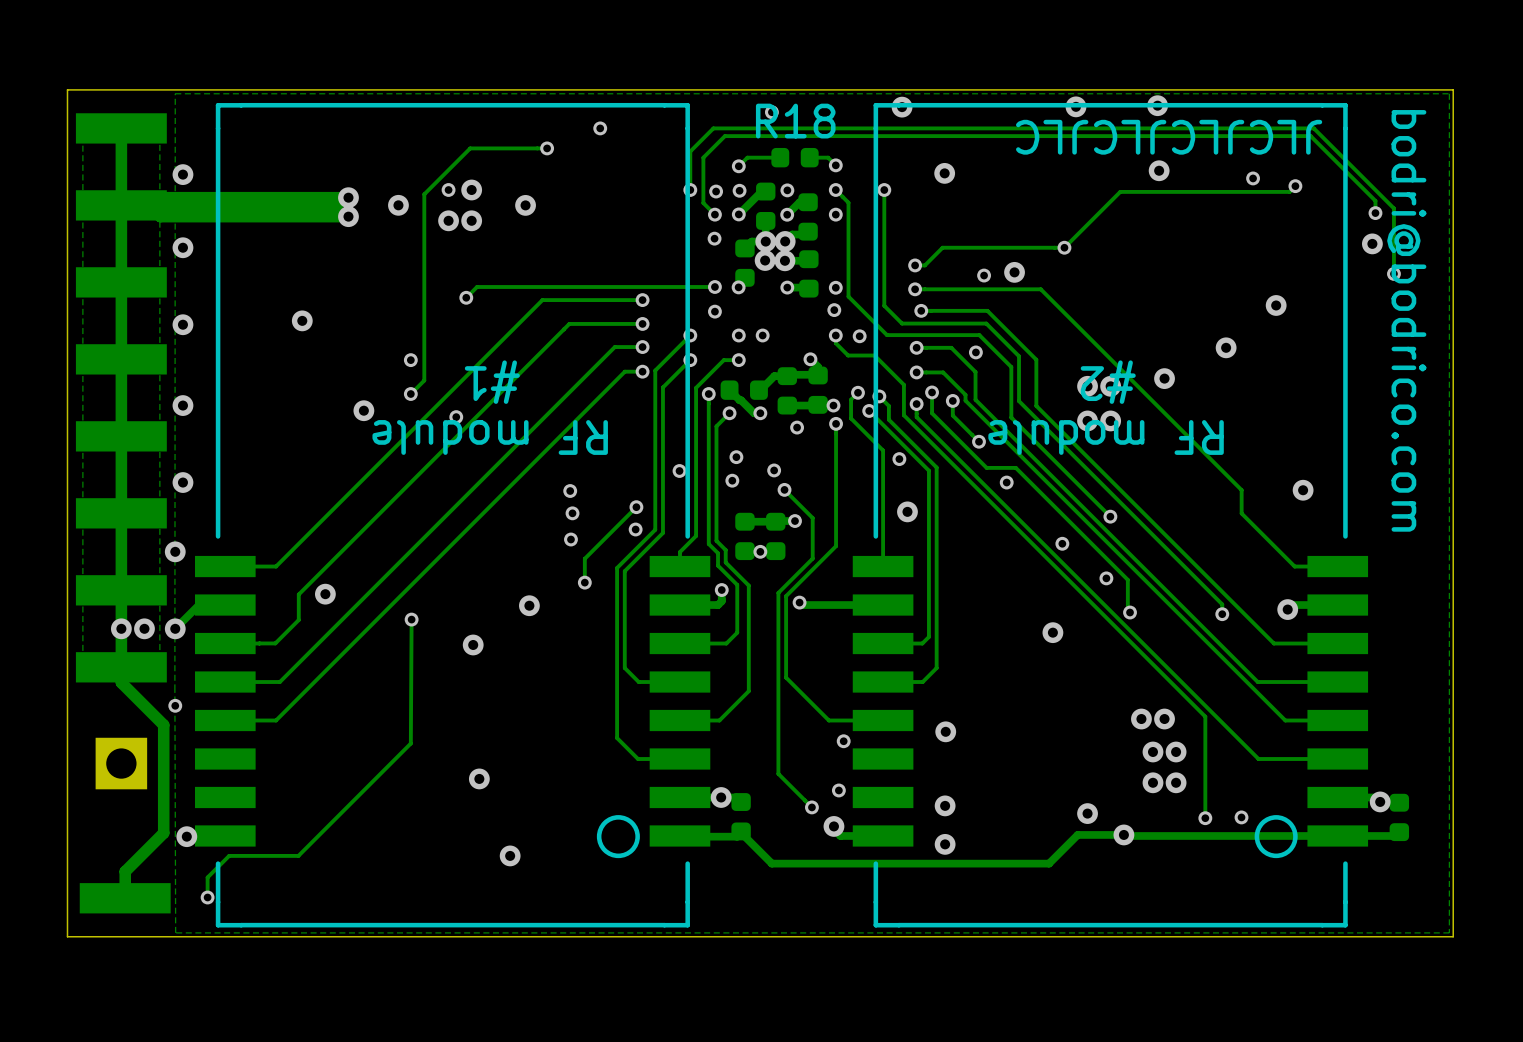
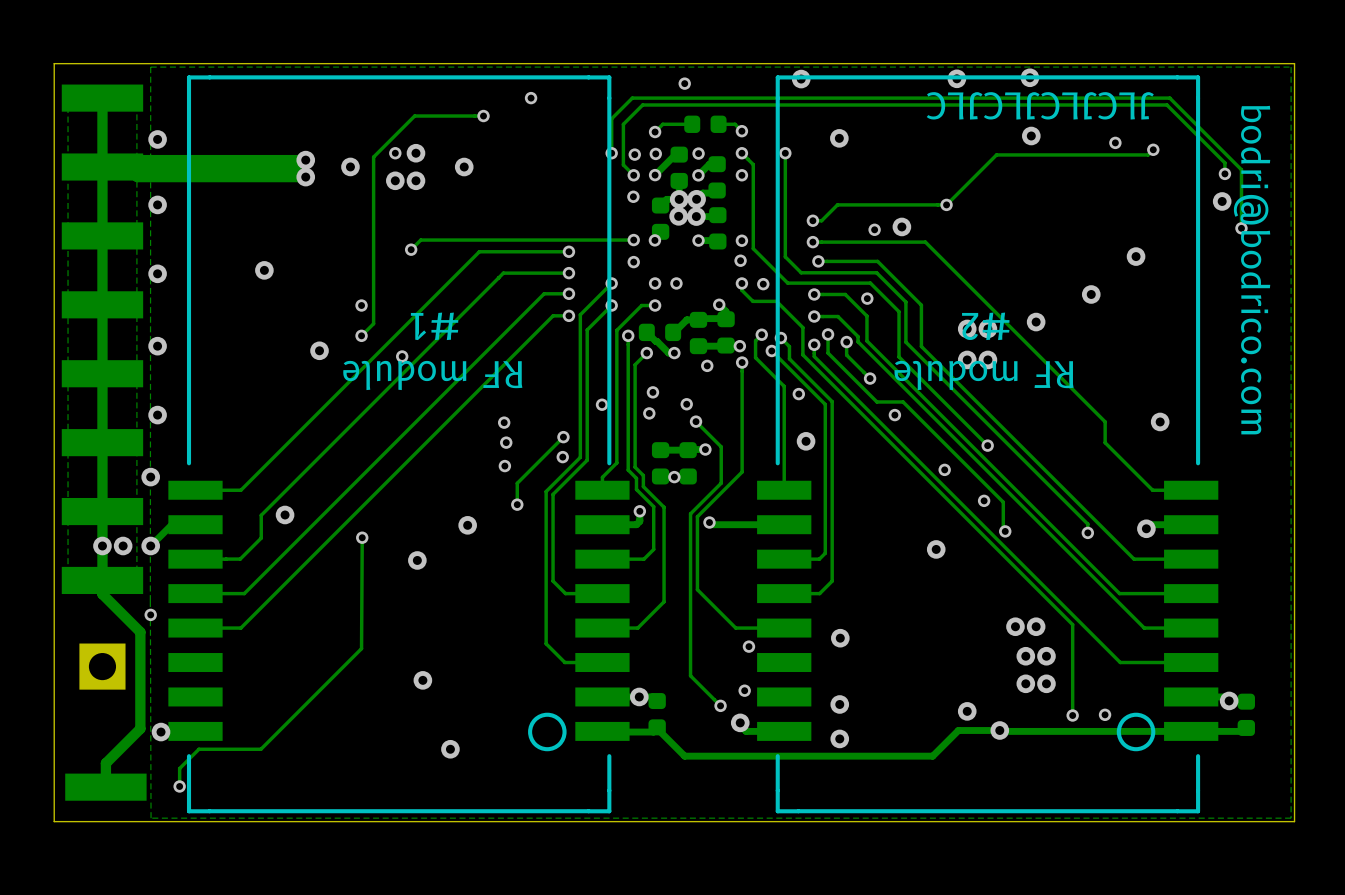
R18 name: R18 (795, 121) -> none

